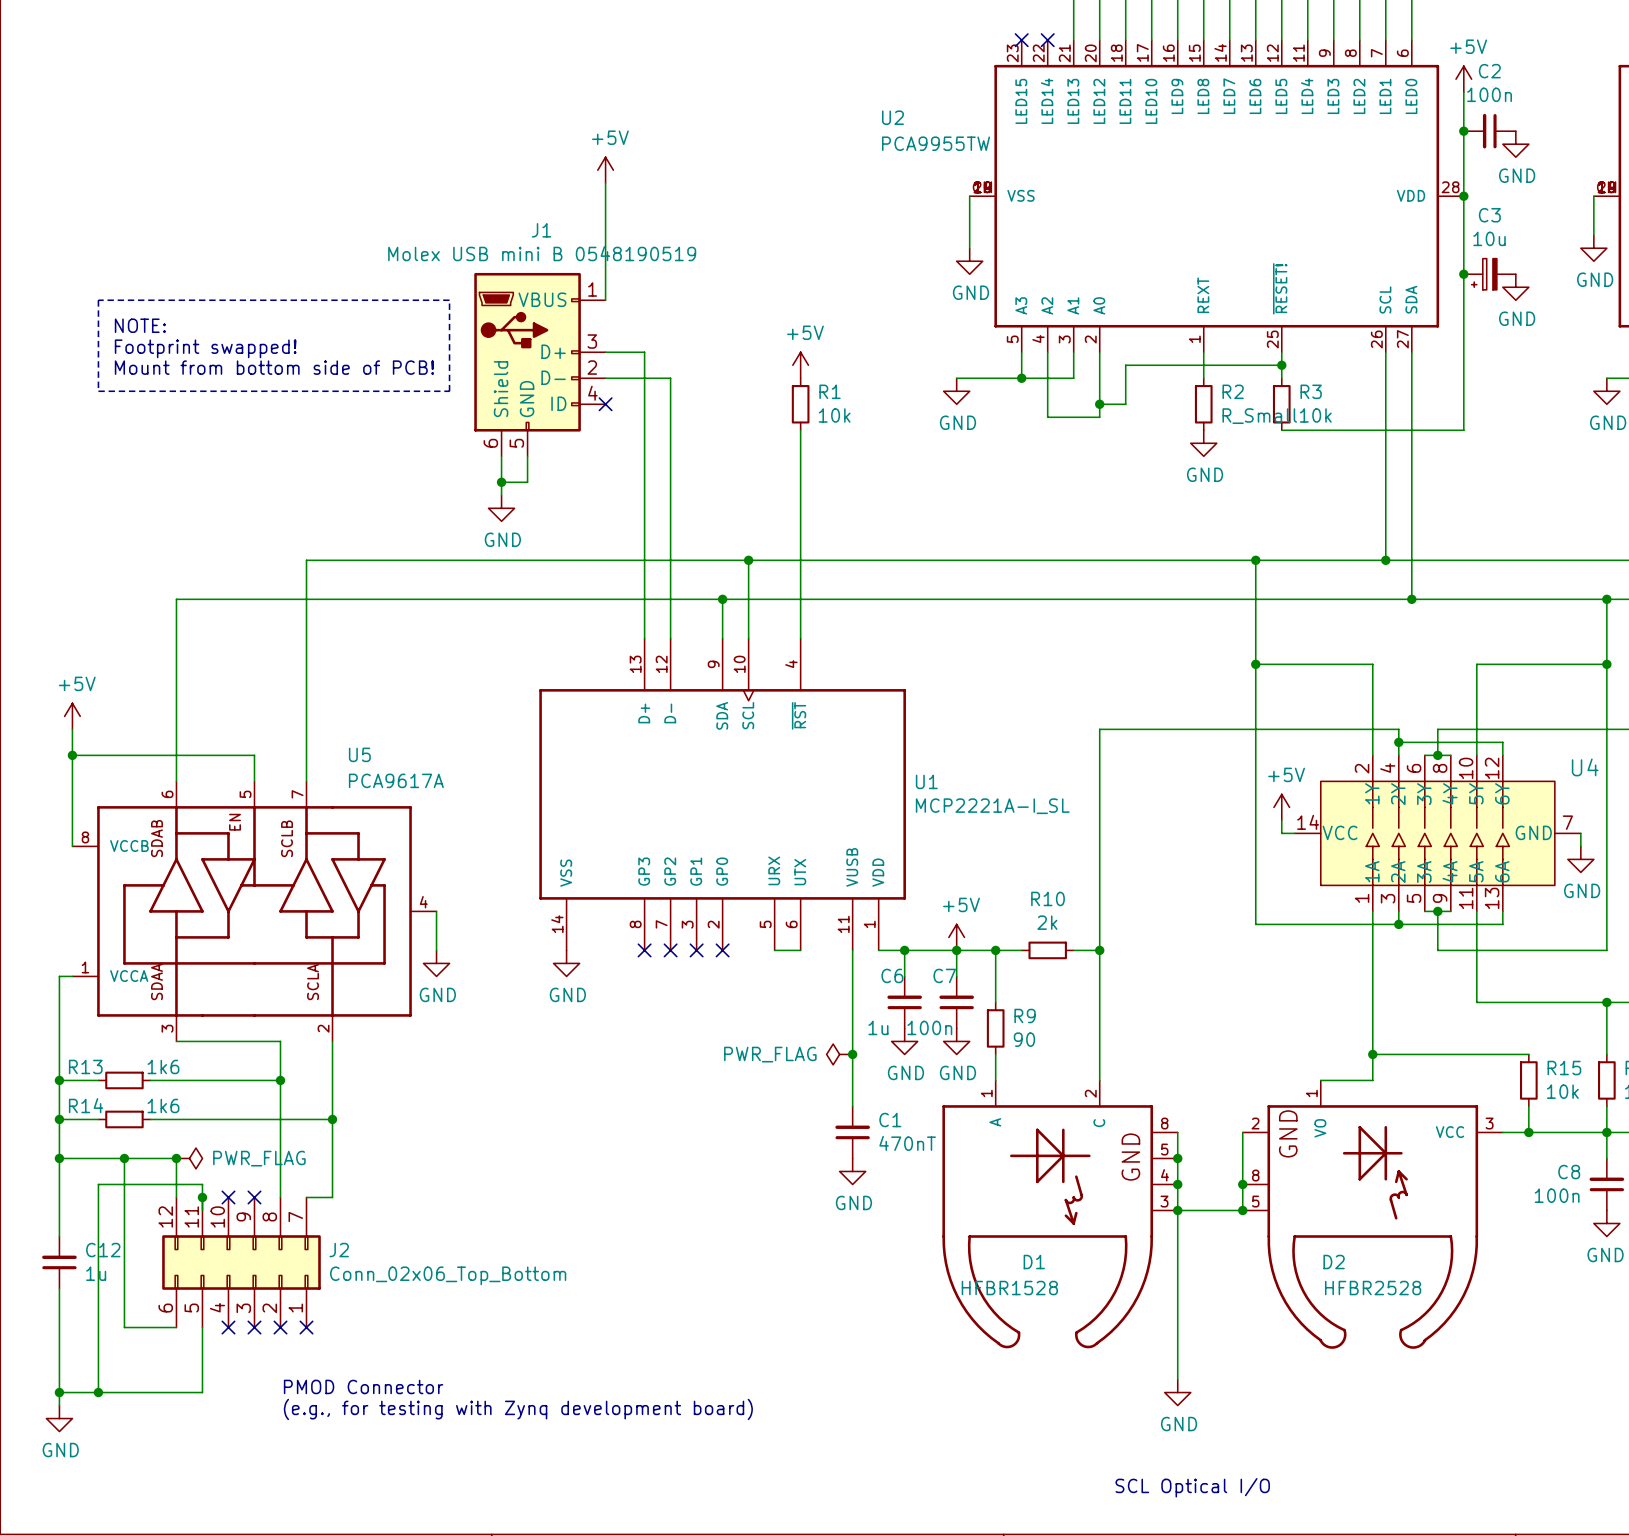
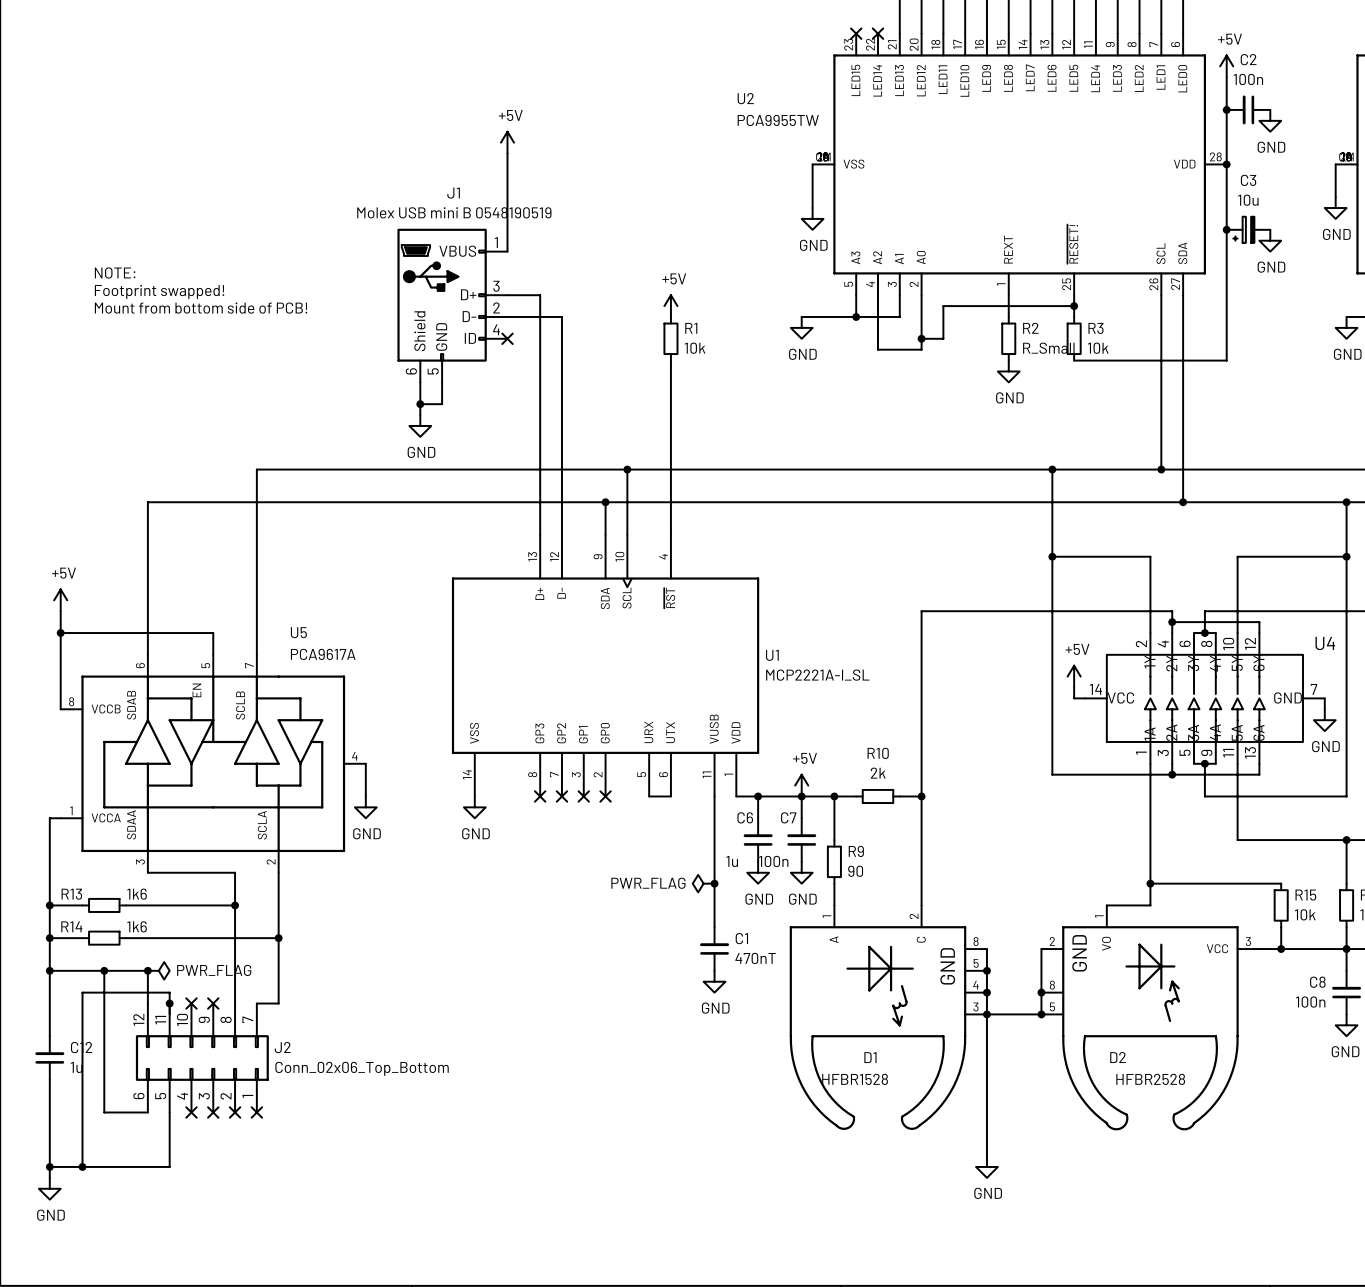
line: (98, 300) (98, 391) (449, 391) (449, 300) (98, 300) -> none
text: PMOD Connector (363, 1386) -> none
text: (e.g., for testing with Zynq development board) (518, 1409) -> none
text: SCL Optical I/O (1192, 1487) -> none

